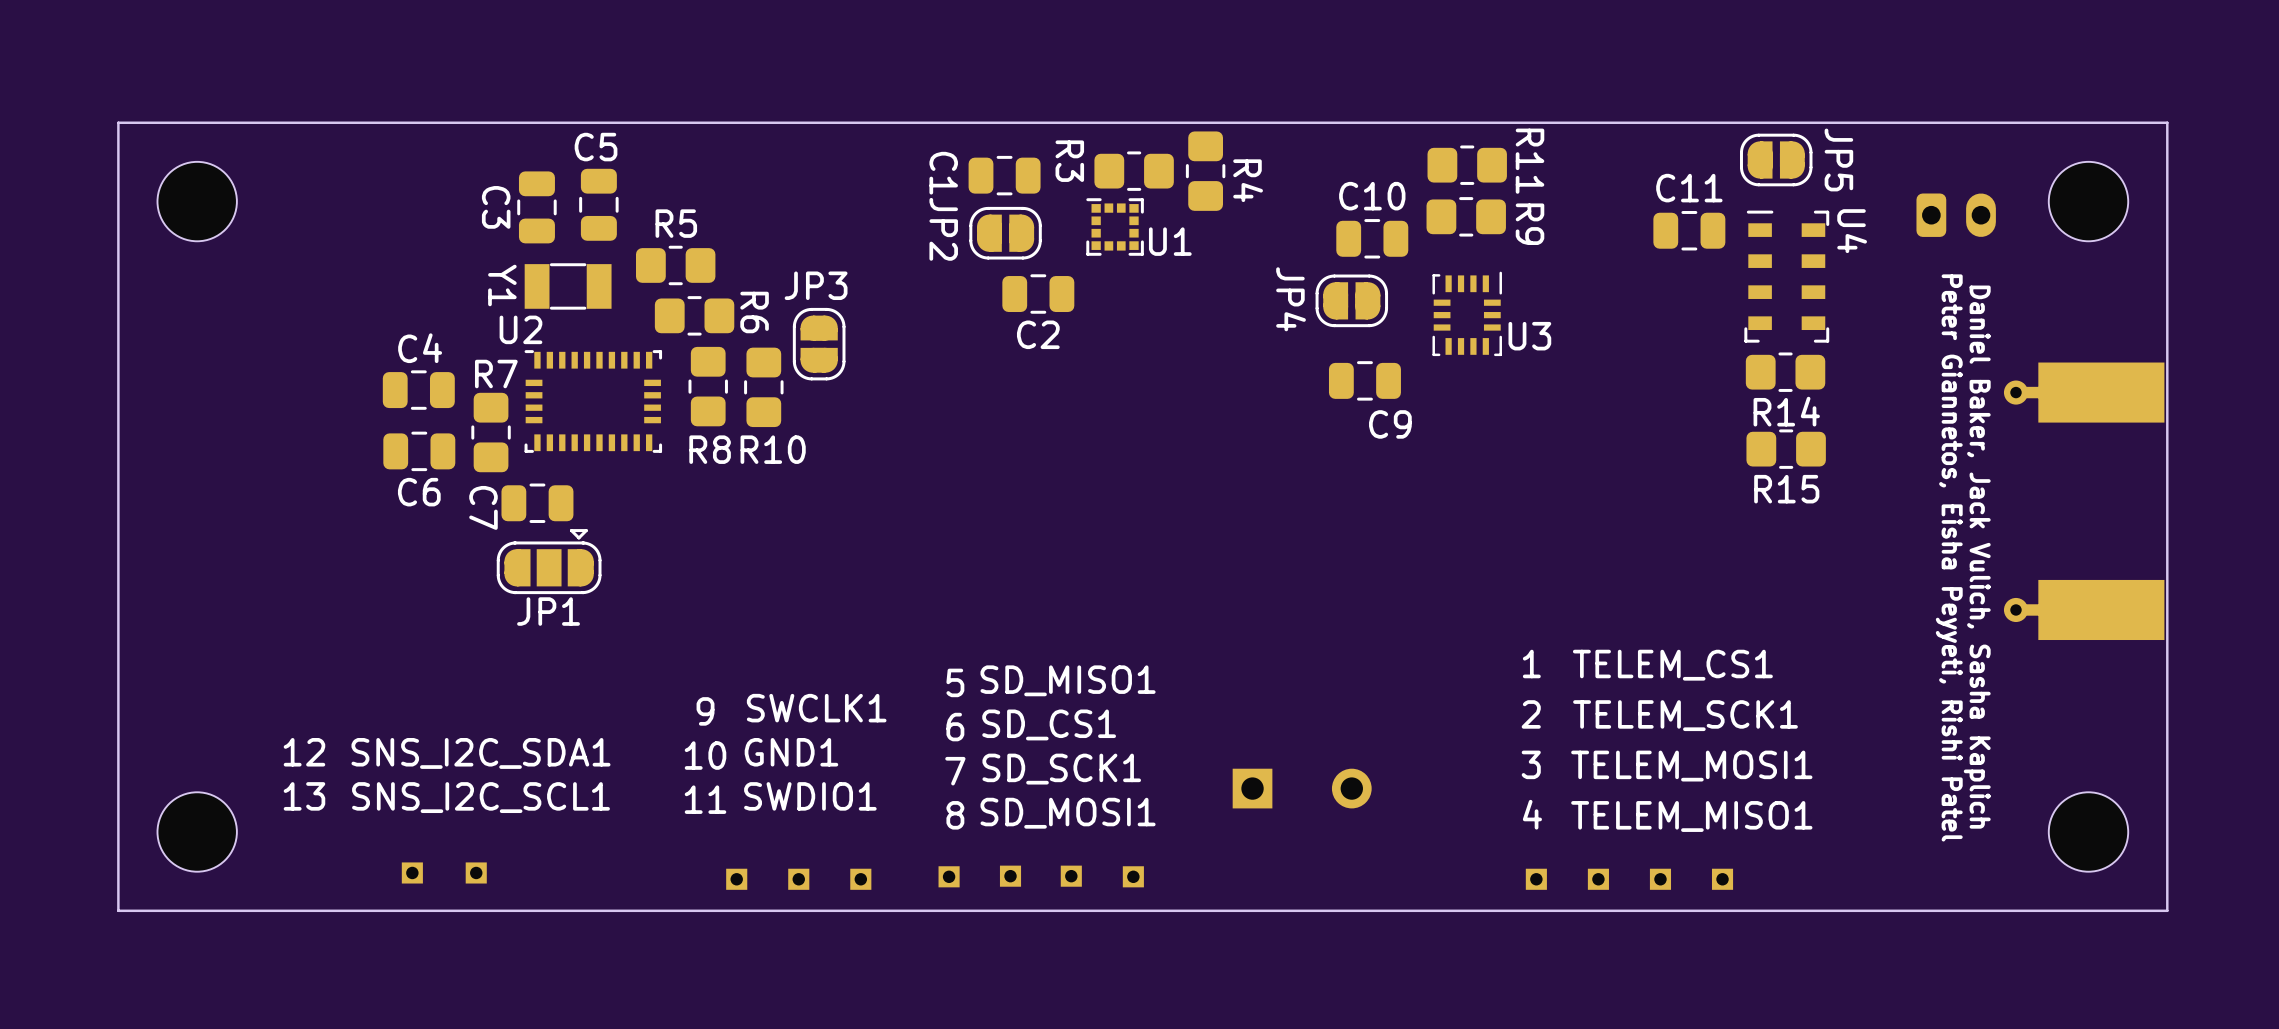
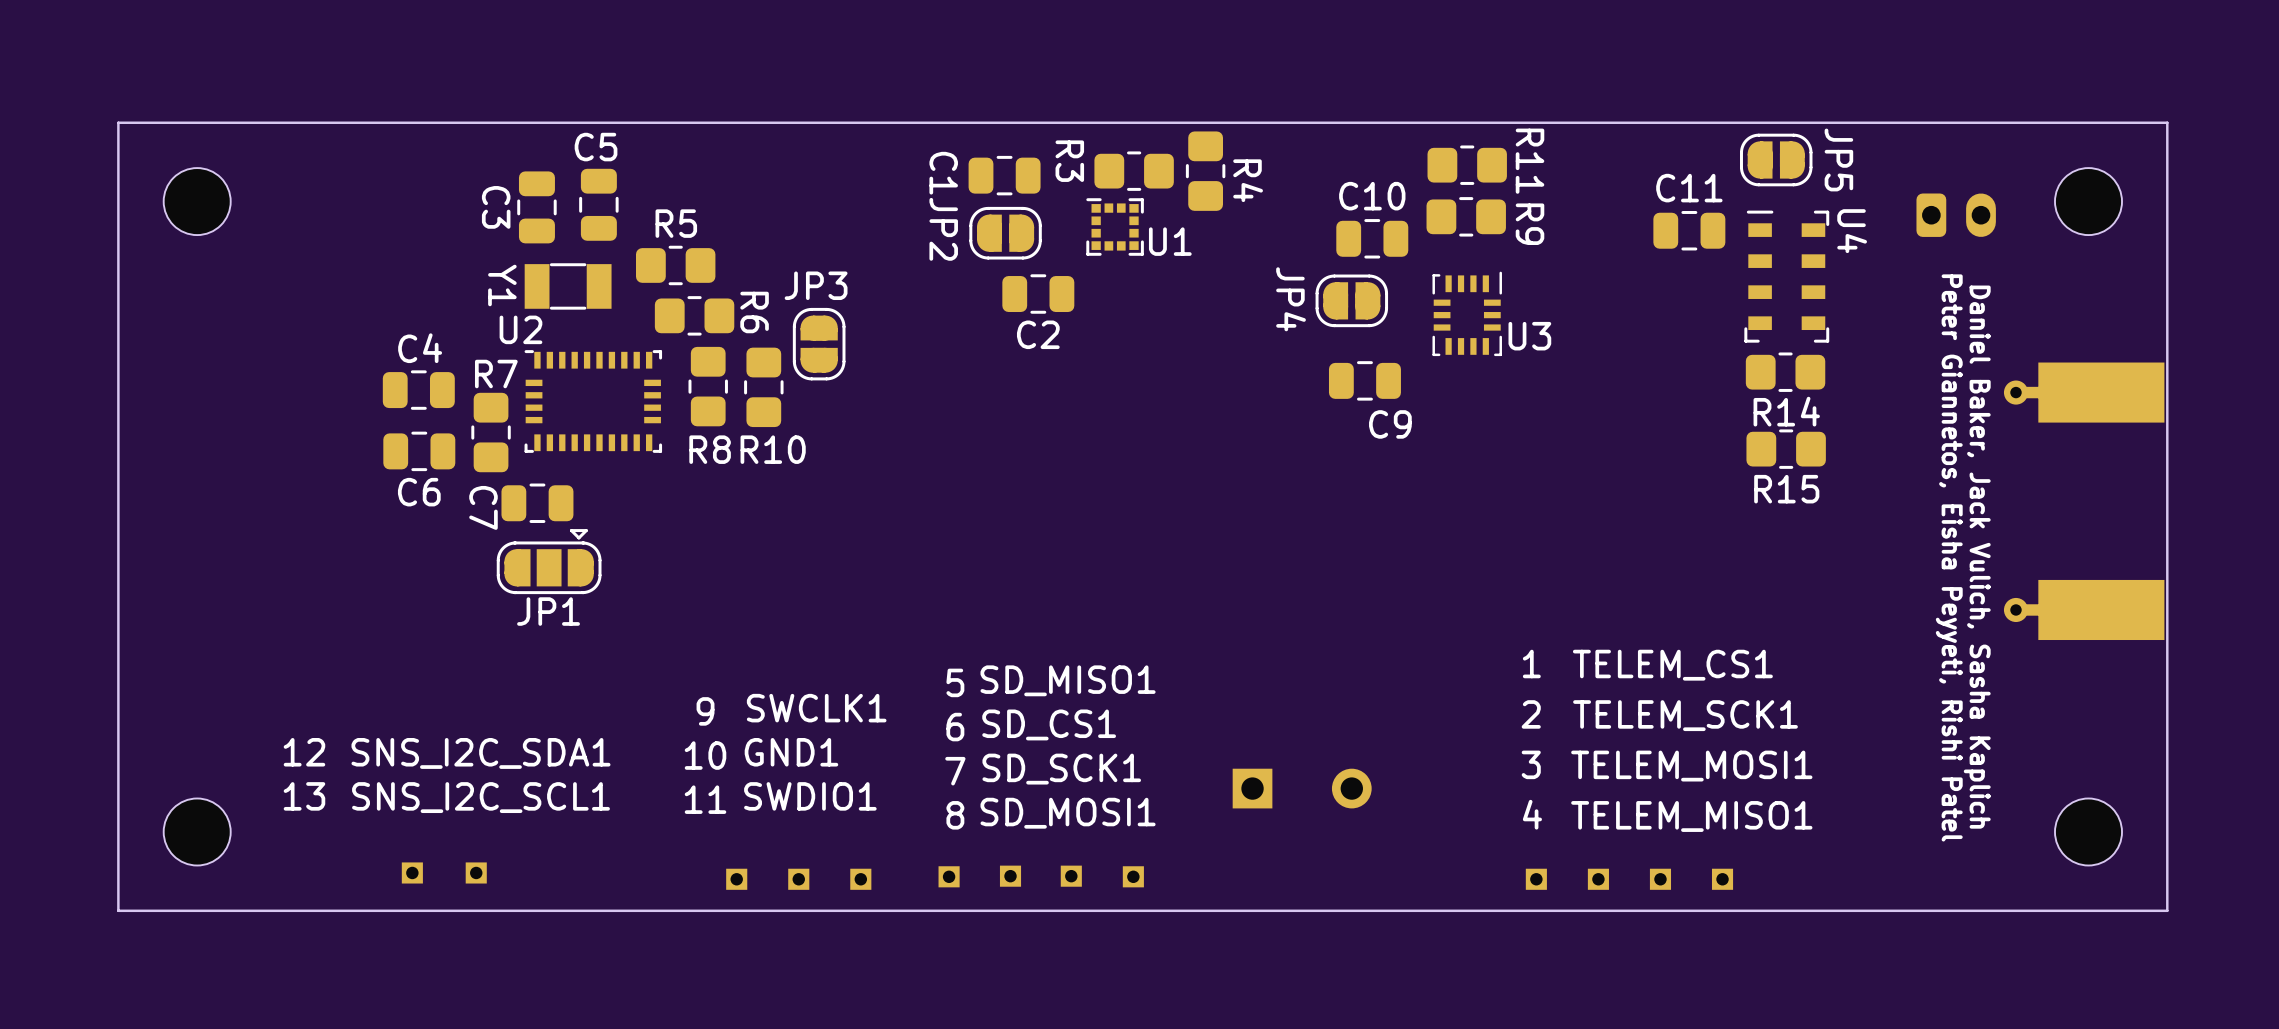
part footprint: [157, 161, 237, 242] -> [163, 168, 231, 236]
part footprint: [2048, 161, 2129, 242] -> [2054, 168, 2123, 236]
part footprint: [157, 792, 237, 872] -> [163, 798, 231, 866]
part footprint: [2048, 792, 2129, 872] -> [2054, 798, 2123, 866]

